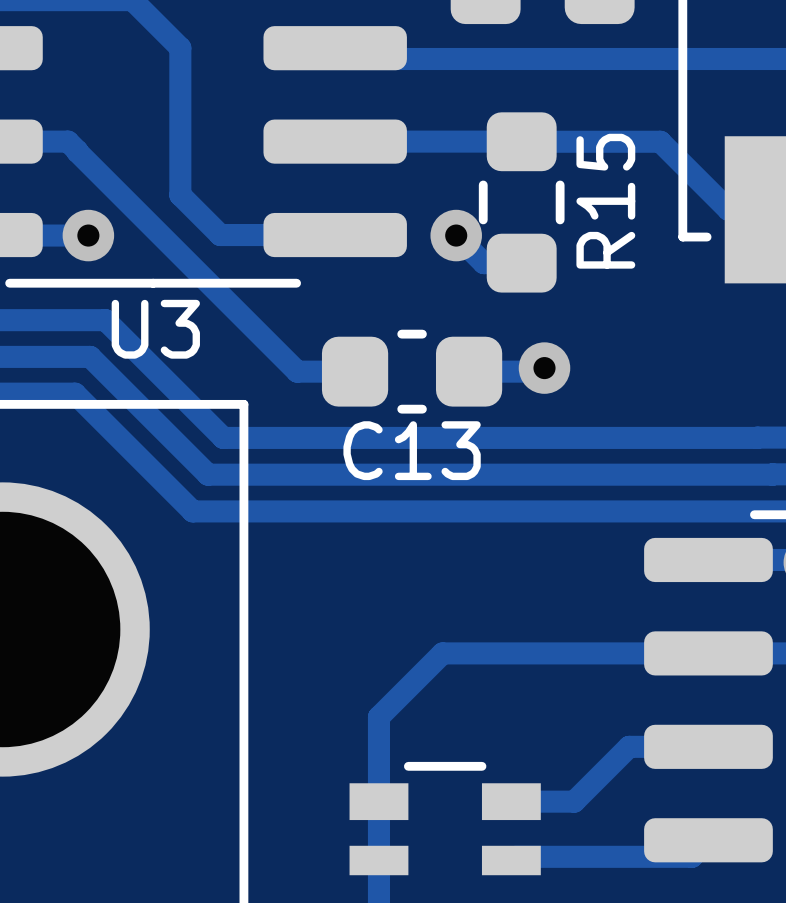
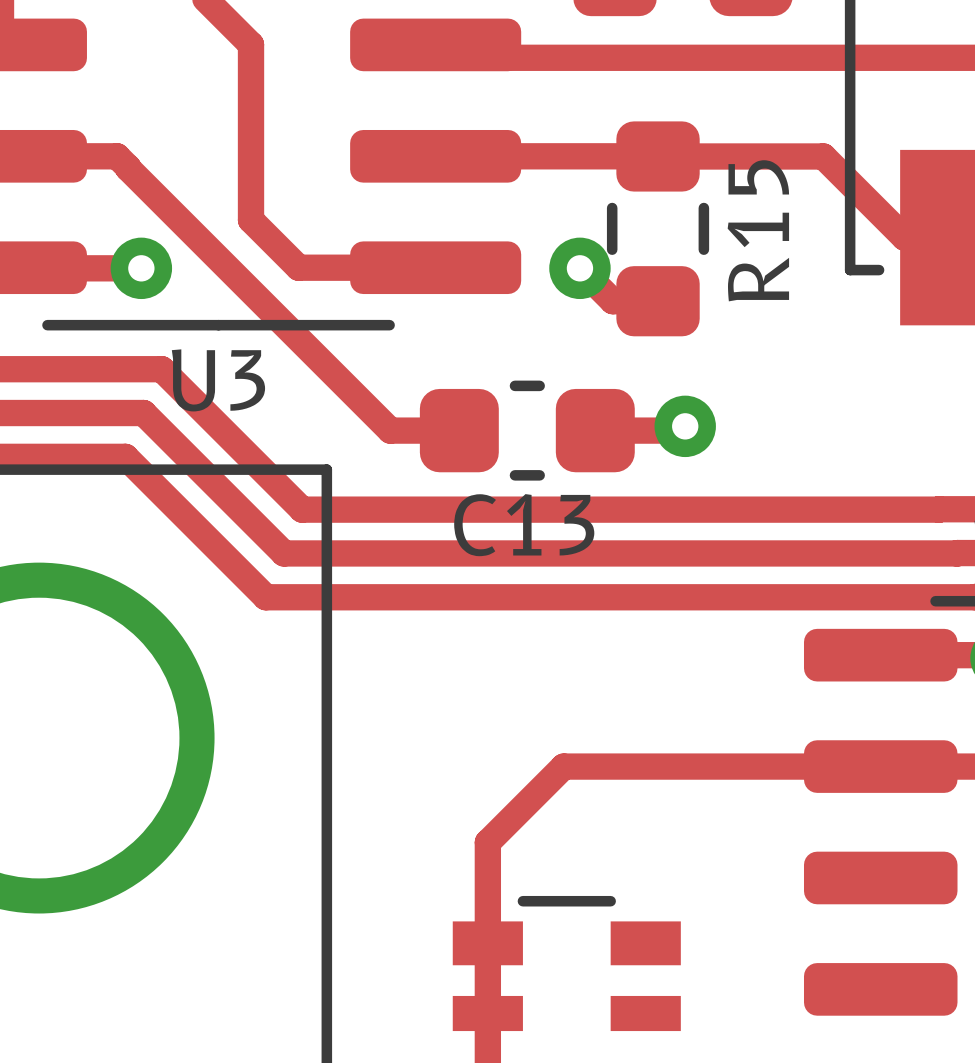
track: (708, 746) (629, 746) (574, 801) (511, 801) -> none
track: (708, 840) (691, 856) (515, 856) -> none

